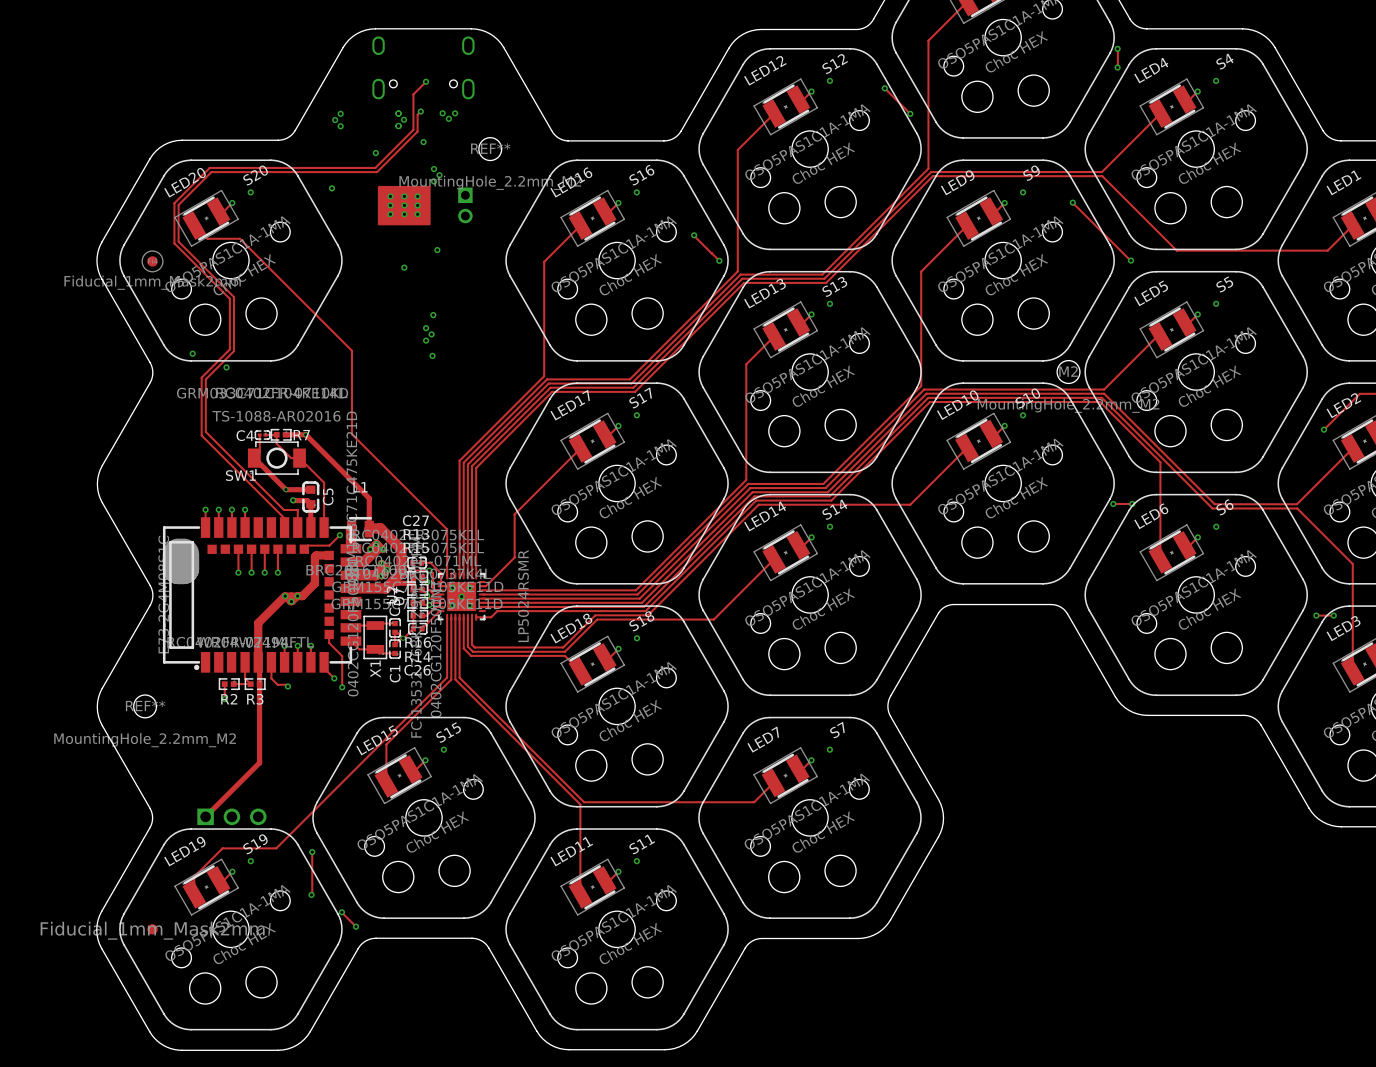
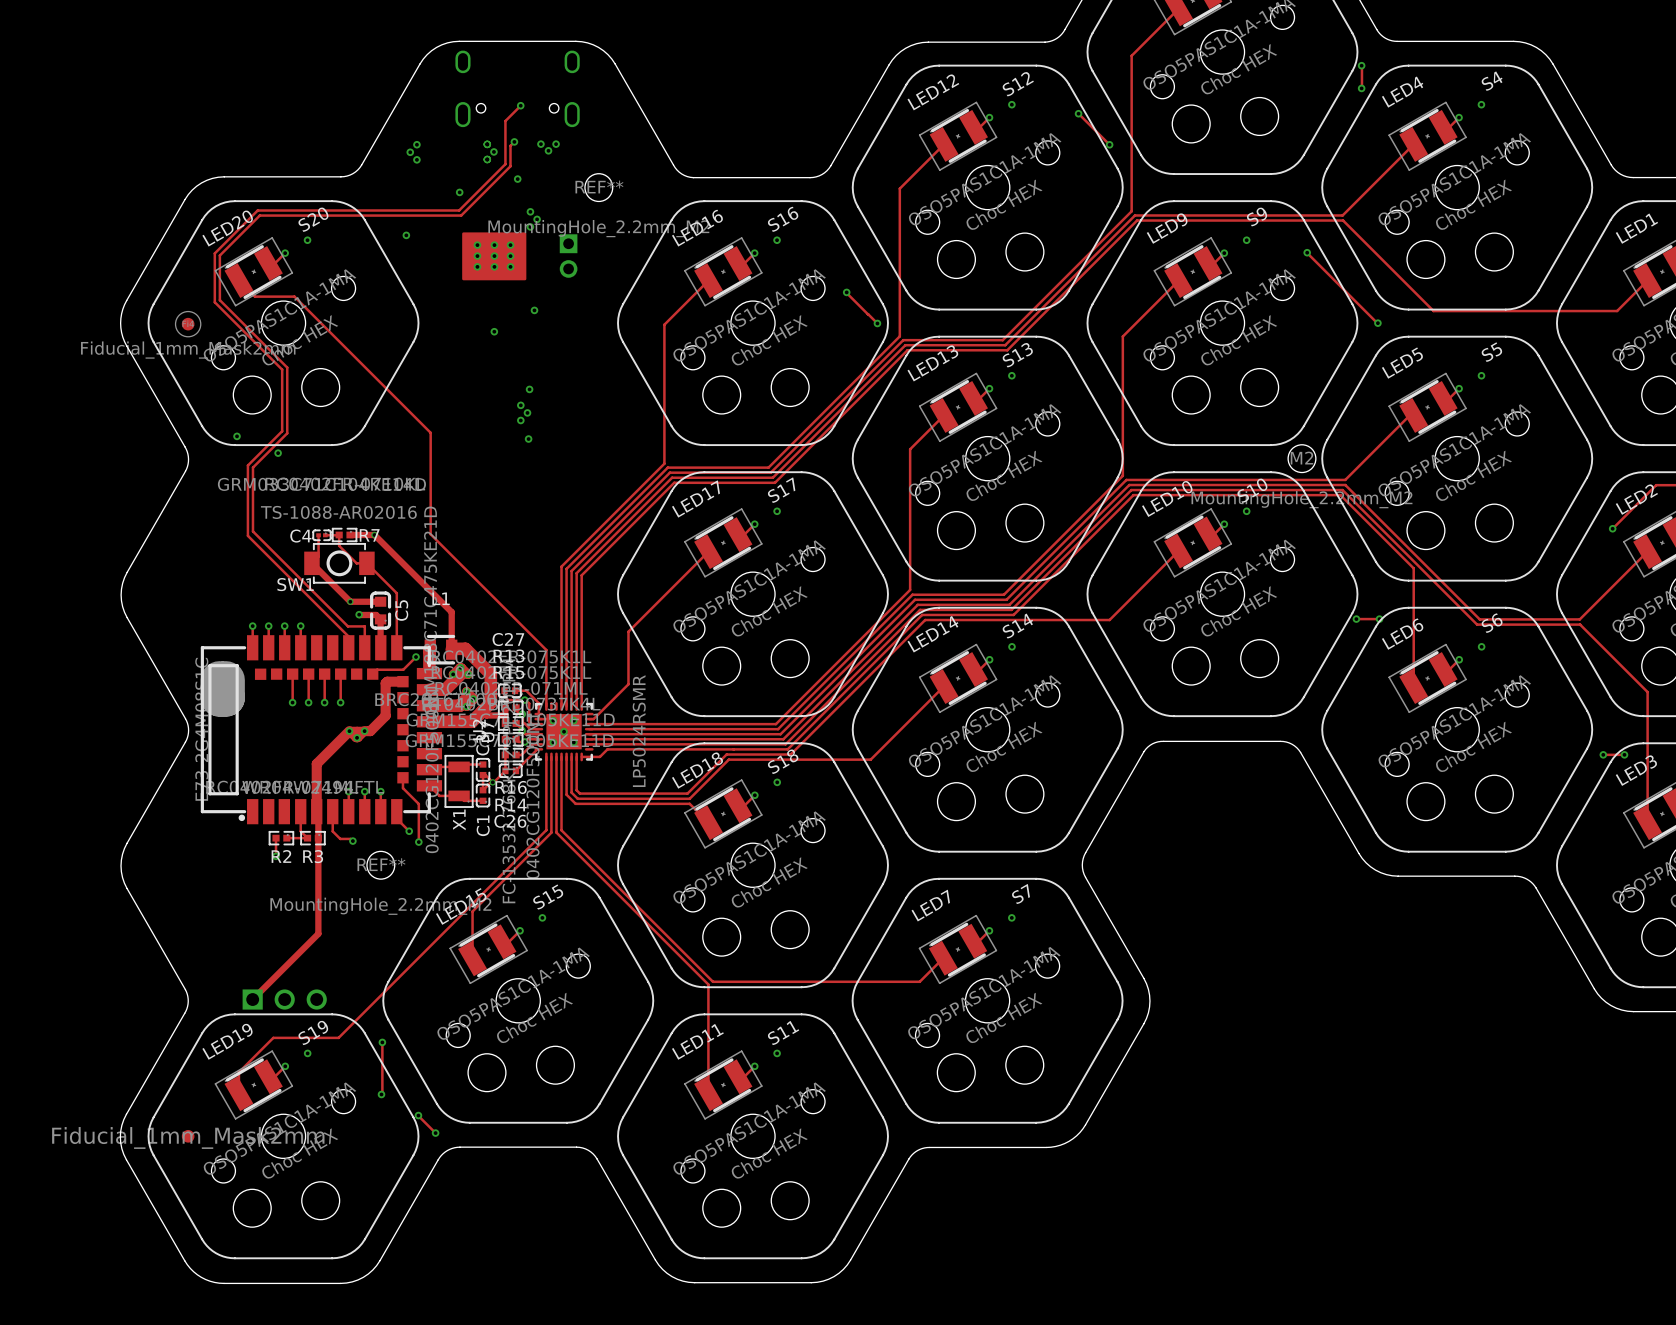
REF** position: (145, 706) -> (380, 865)

